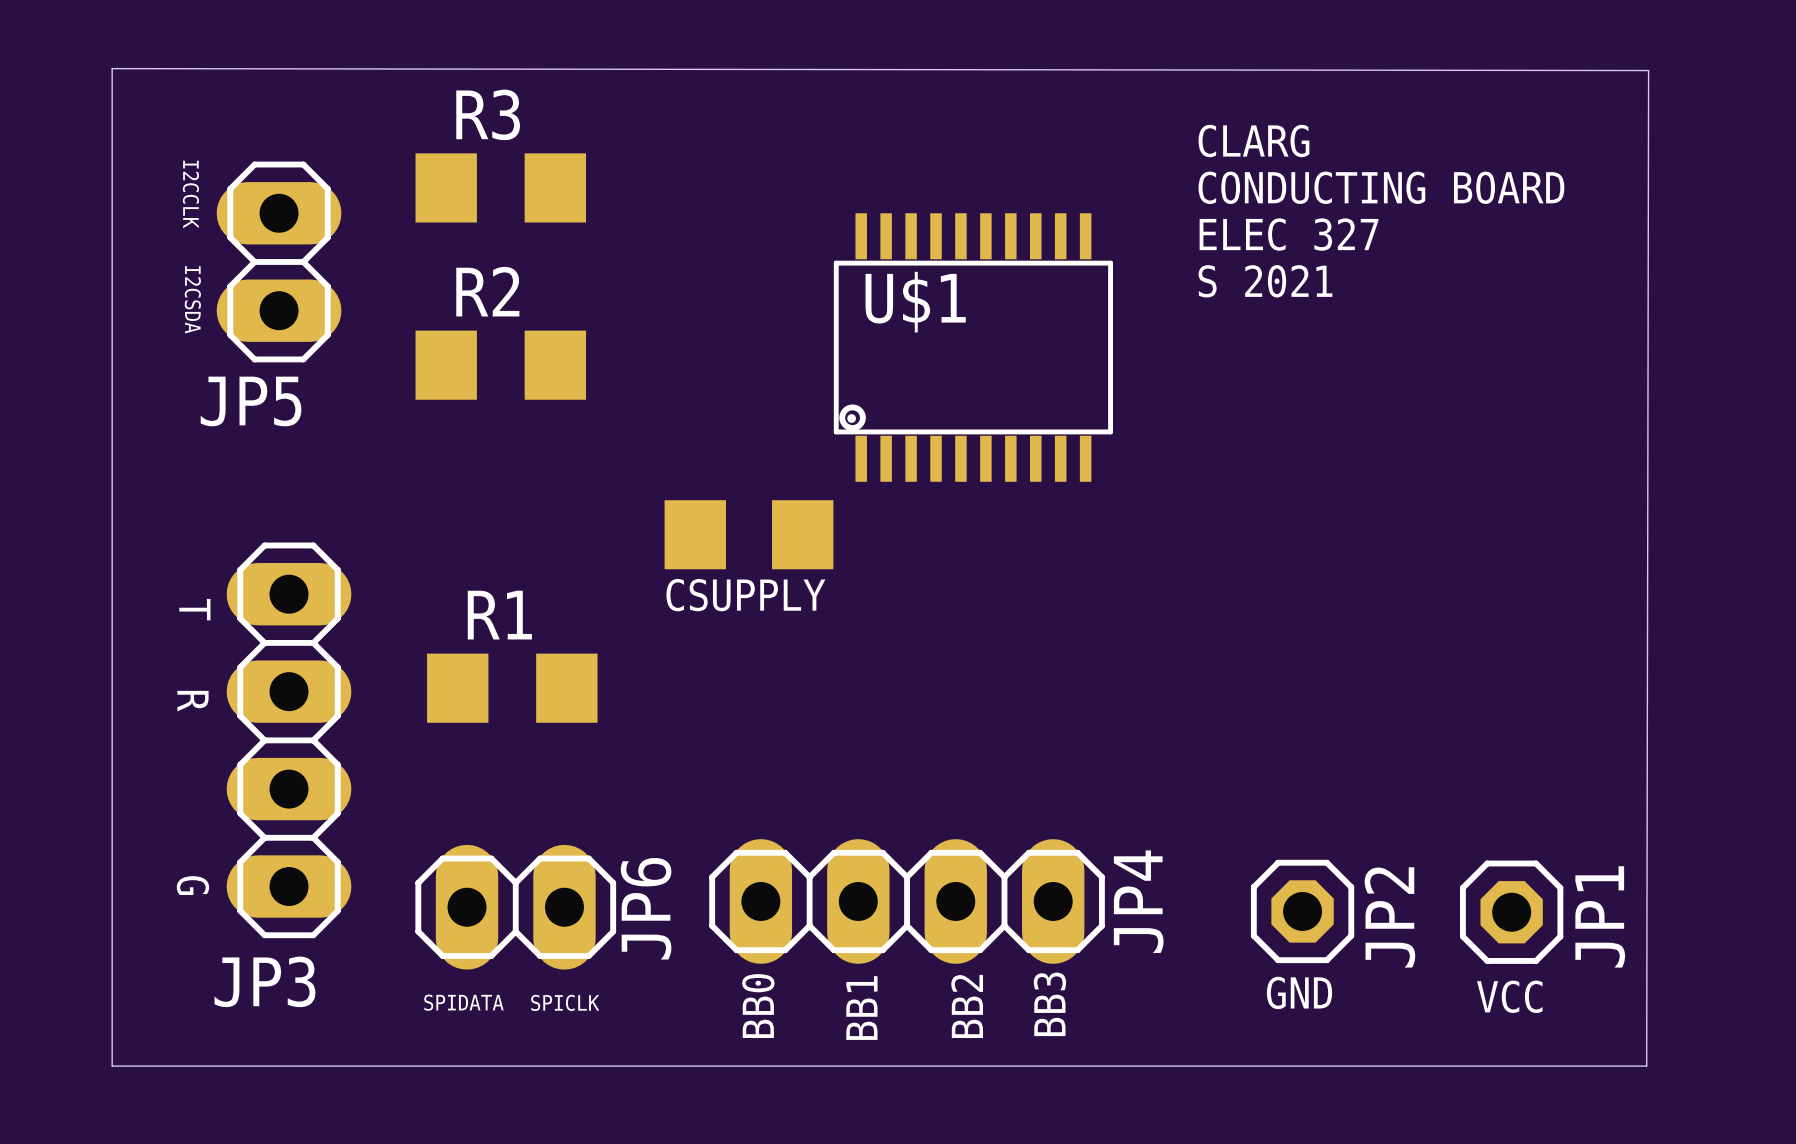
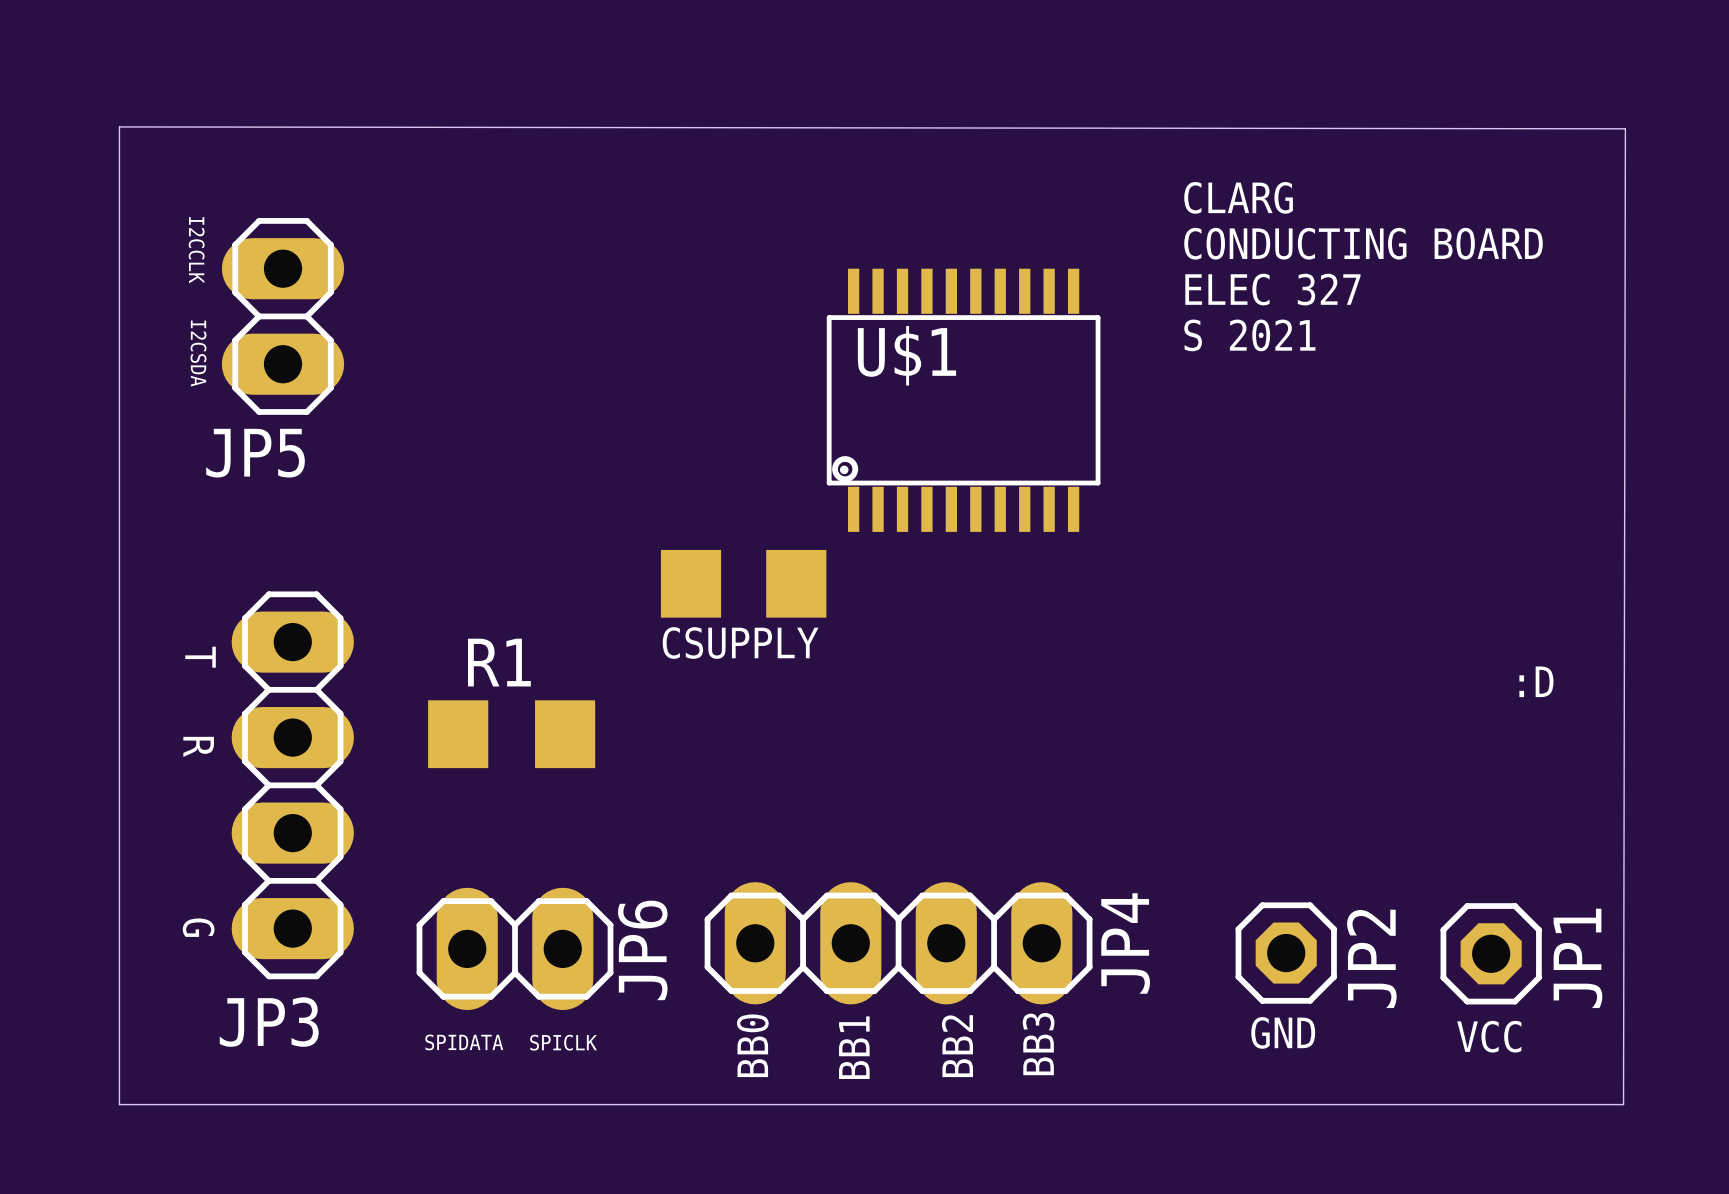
R3: (500, 187) -> none
R2: (500, 365) -> none
text: none -> :D (1536, 681)

